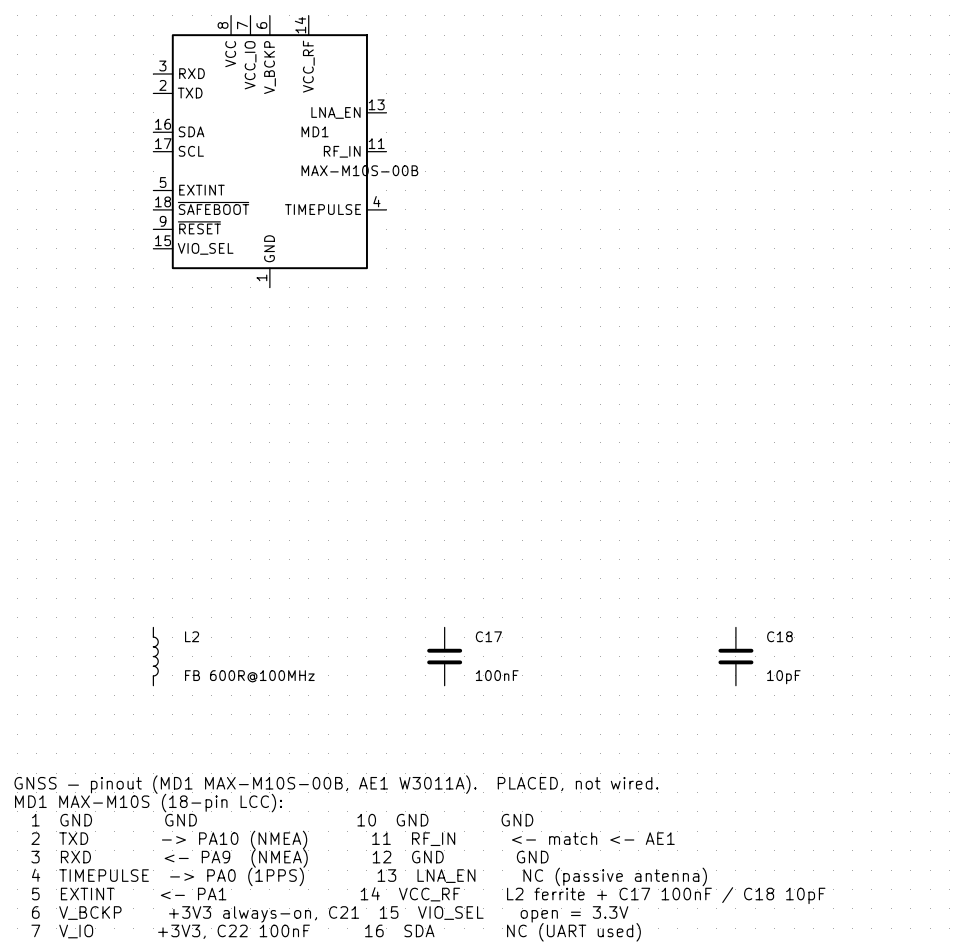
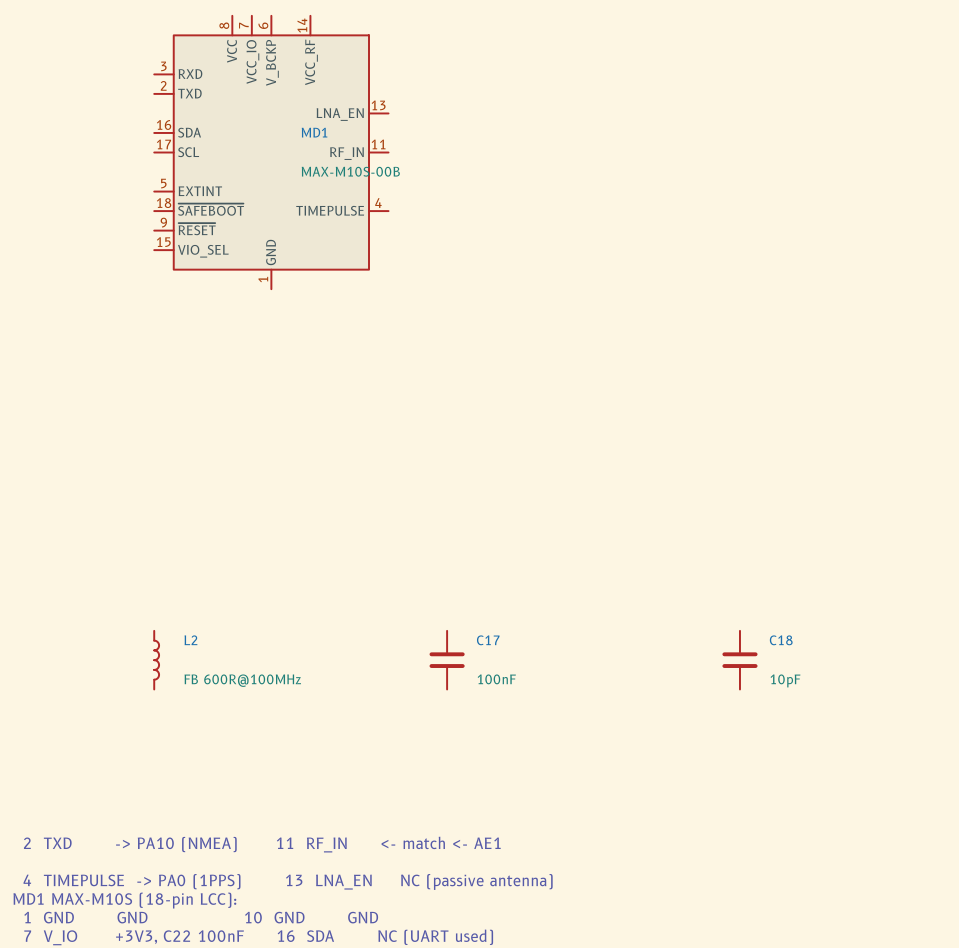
text: GNSS — pinout (MD1 MAX-M10S-00B, AE1 W3011A). PLACED, not wired. (336, 784) -> none
text: MD1 MAX-M10S (18-pin LCC): (148, 803) -> none
text: 1 GND GND 10 GND GND (282, 820) -> none
text: 3 RXD <- PA9 (NMEA) 12 GND GND (290, 858) -> none
text: 5 EXTINT <- PA1 14 VCC_RF L2 ferrite + C17 100nF / C18 10pF (428, 895) -> MD1 MAX-M10S (18-pin LCC): (124, 900)
text: 6 V_BCKP +3V3 always-on, C21 15 VIO_SEL open = 3.3V (330, 914) -> 1 GND GND 10 GND GND (201, 917)

